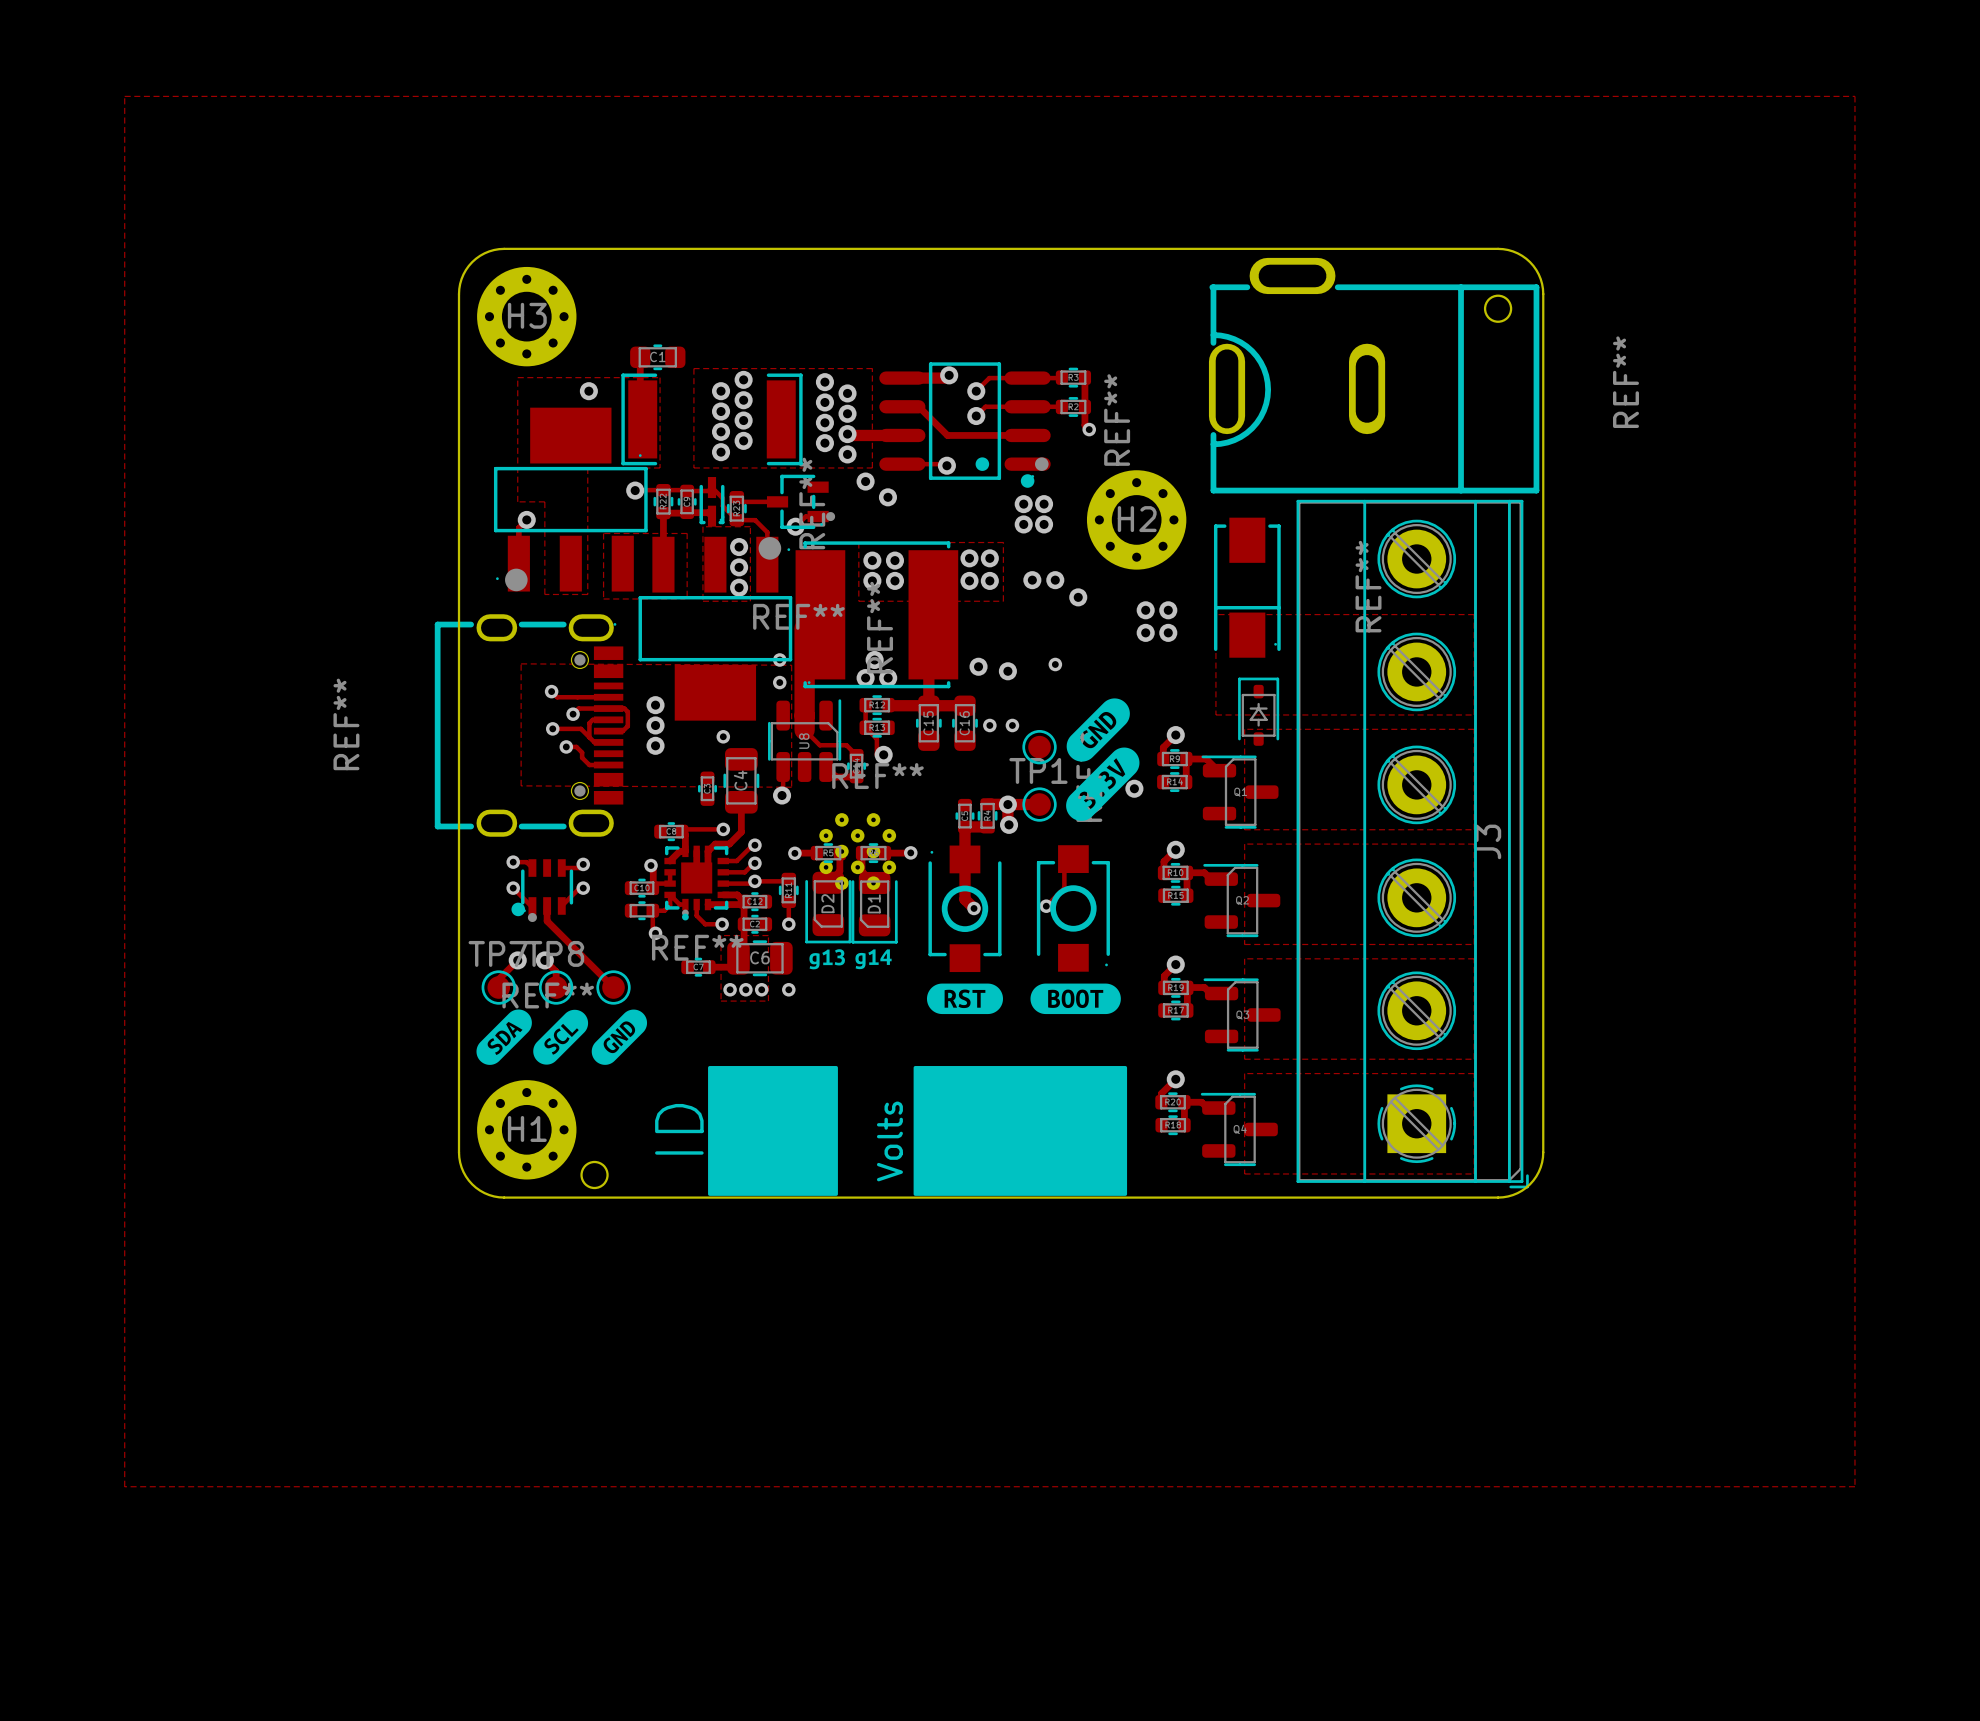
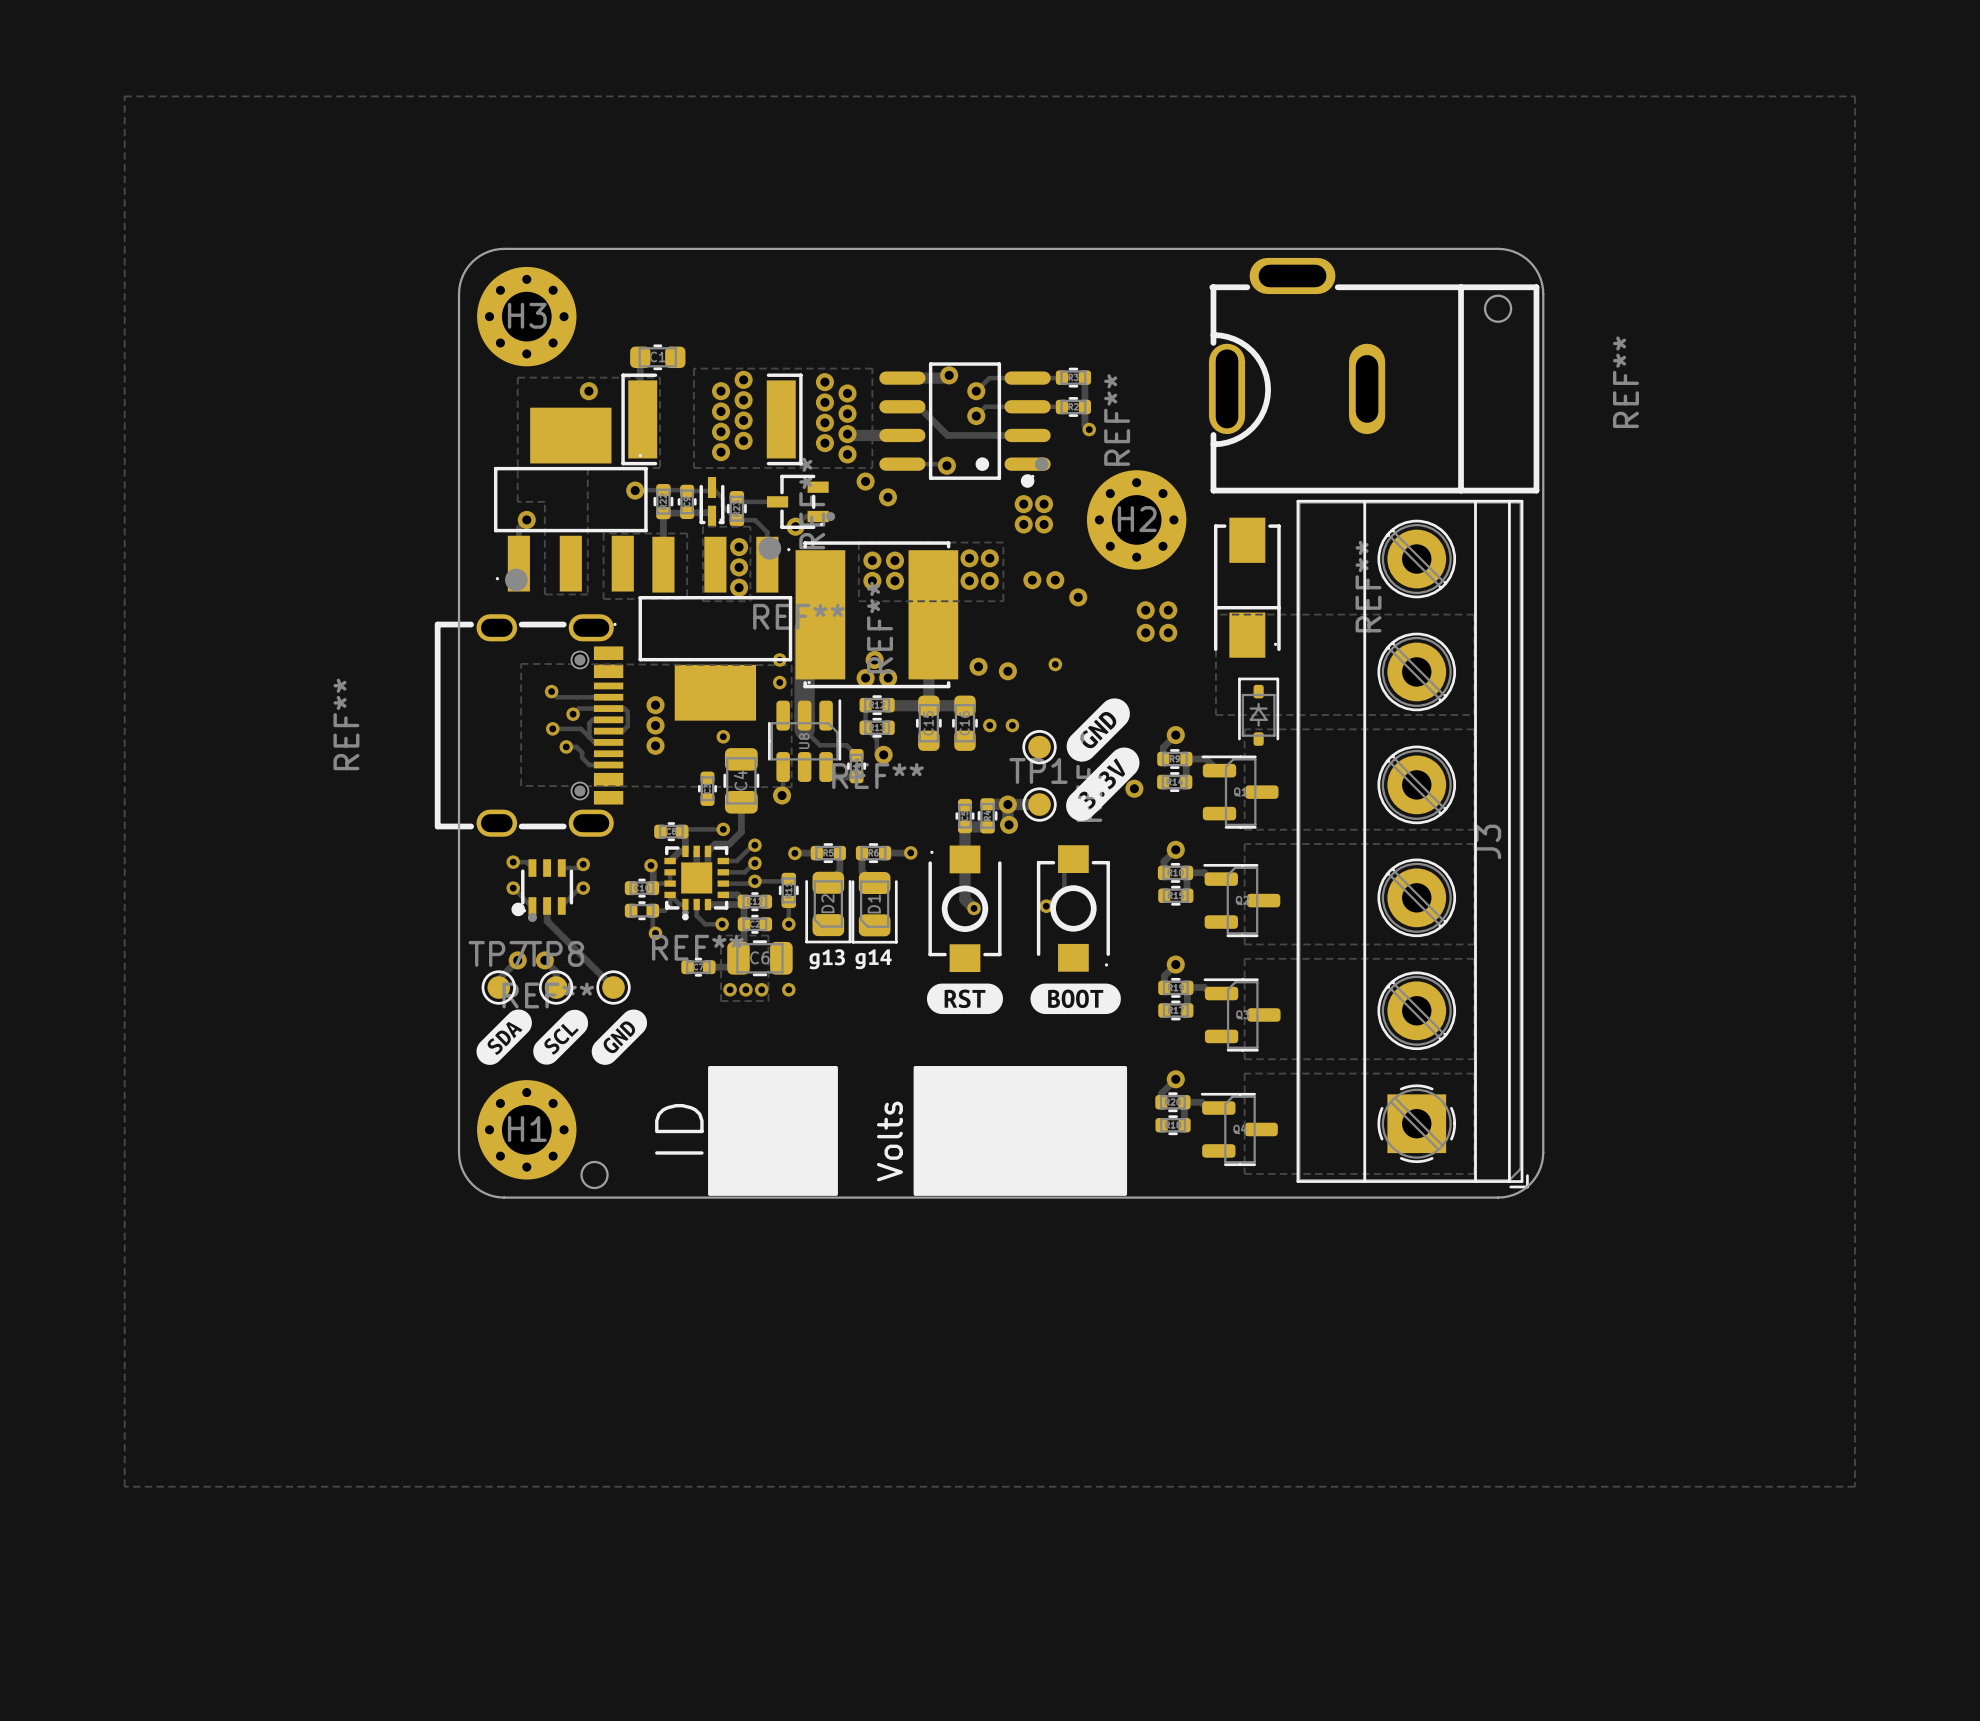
part: (857, 851) -> none

